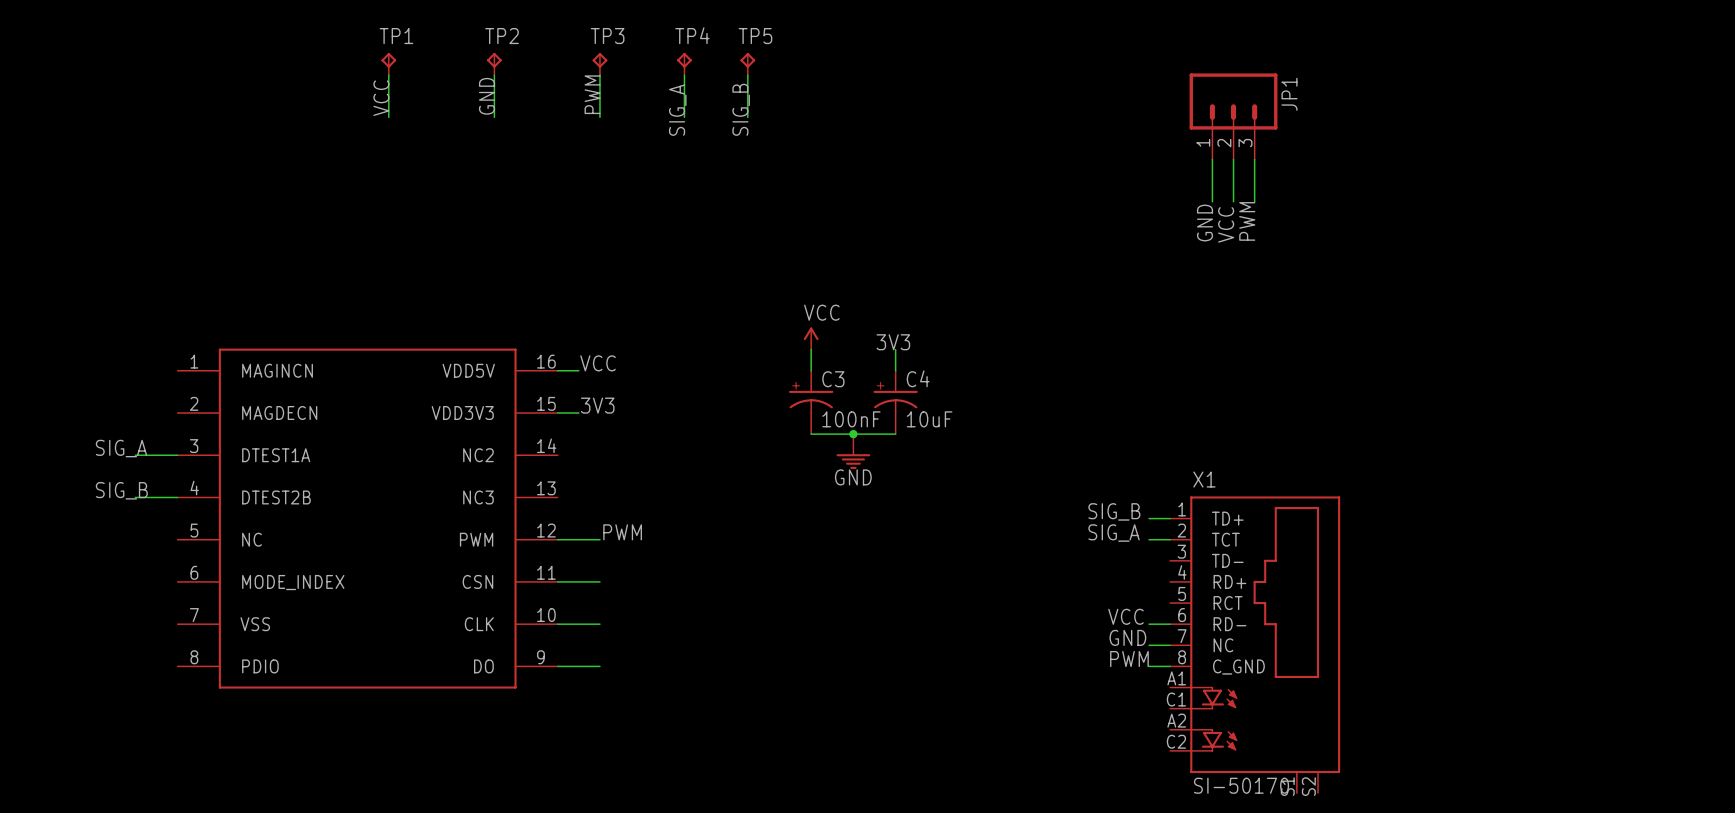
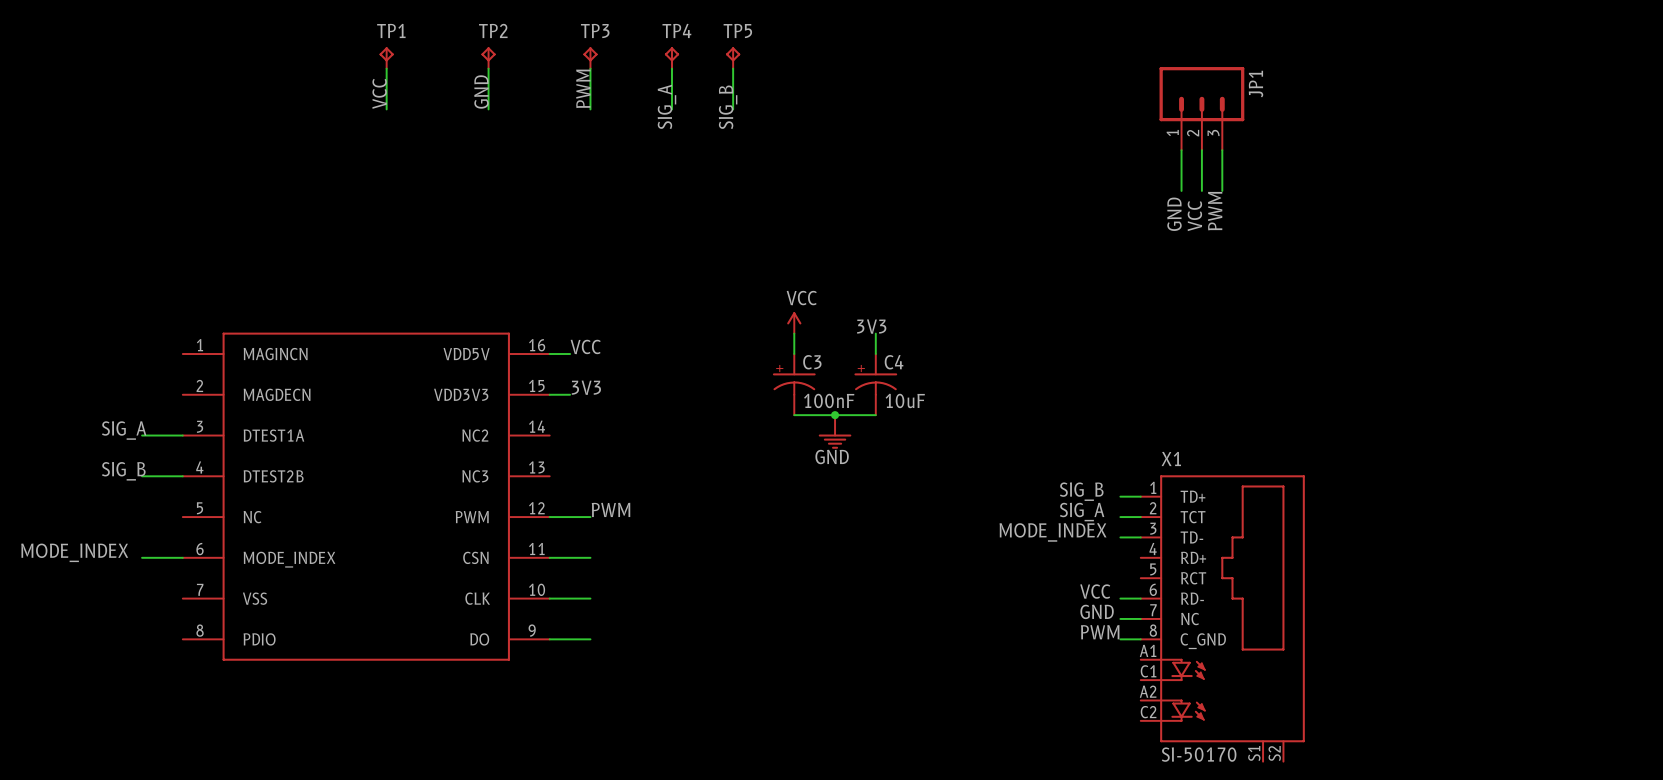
label: none -> MODE_INDEX (1053, 532)
wire: none -> (1120, 537) (1140, 537)
label: none -> MODE_INDEX (74, 552)
wire: none -> (142, 557) (182, 557)

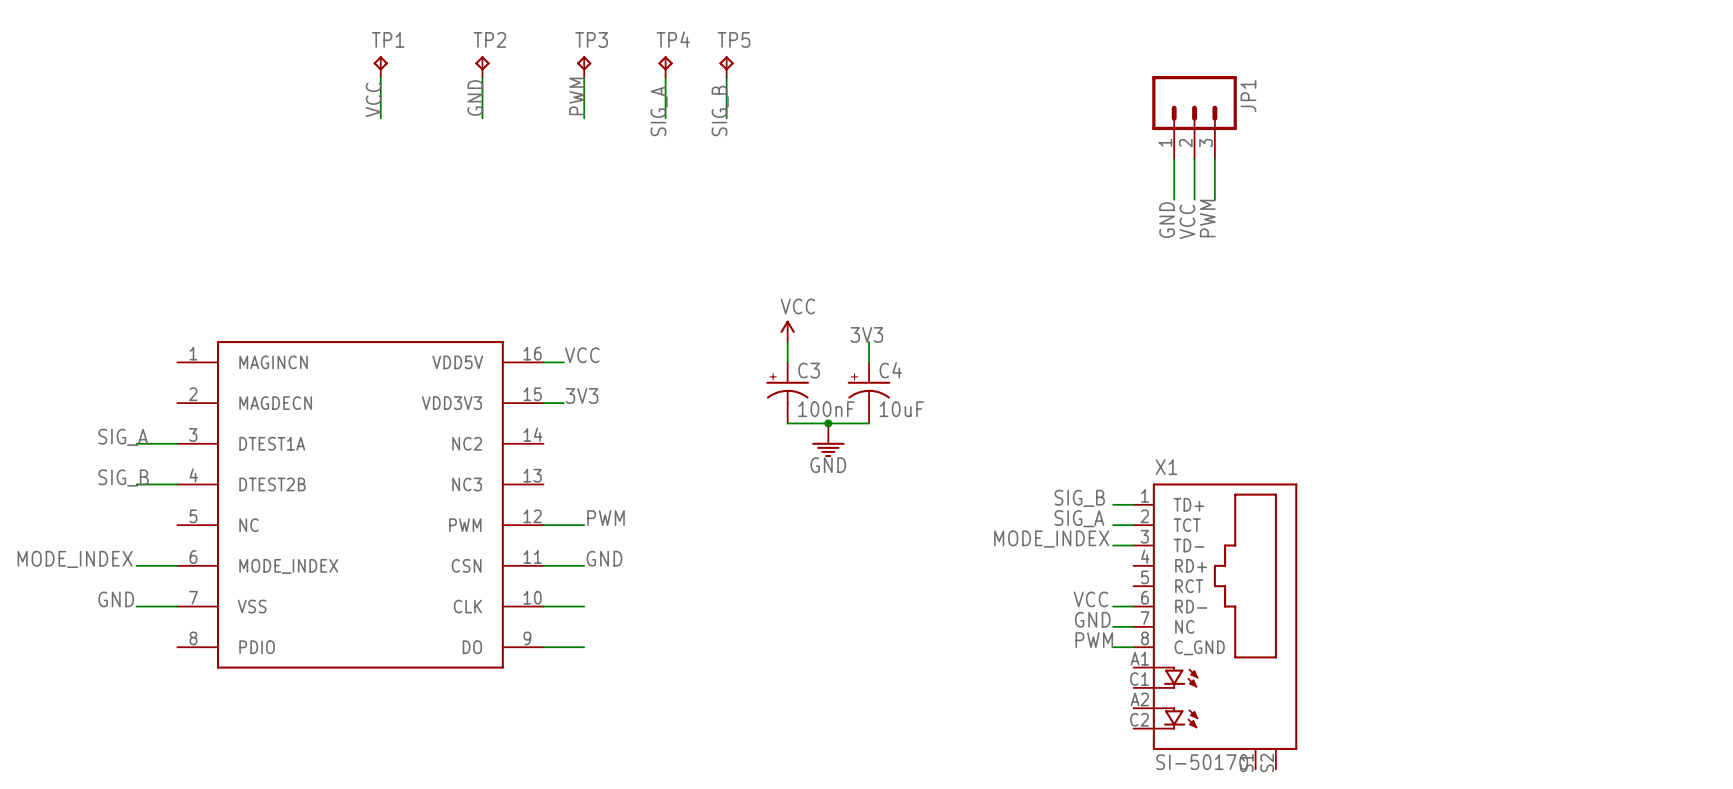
label: none -> GND (604, 558)
label: none -> GND (116, 599)
wire: none -> (136, 606) (177, 606)

